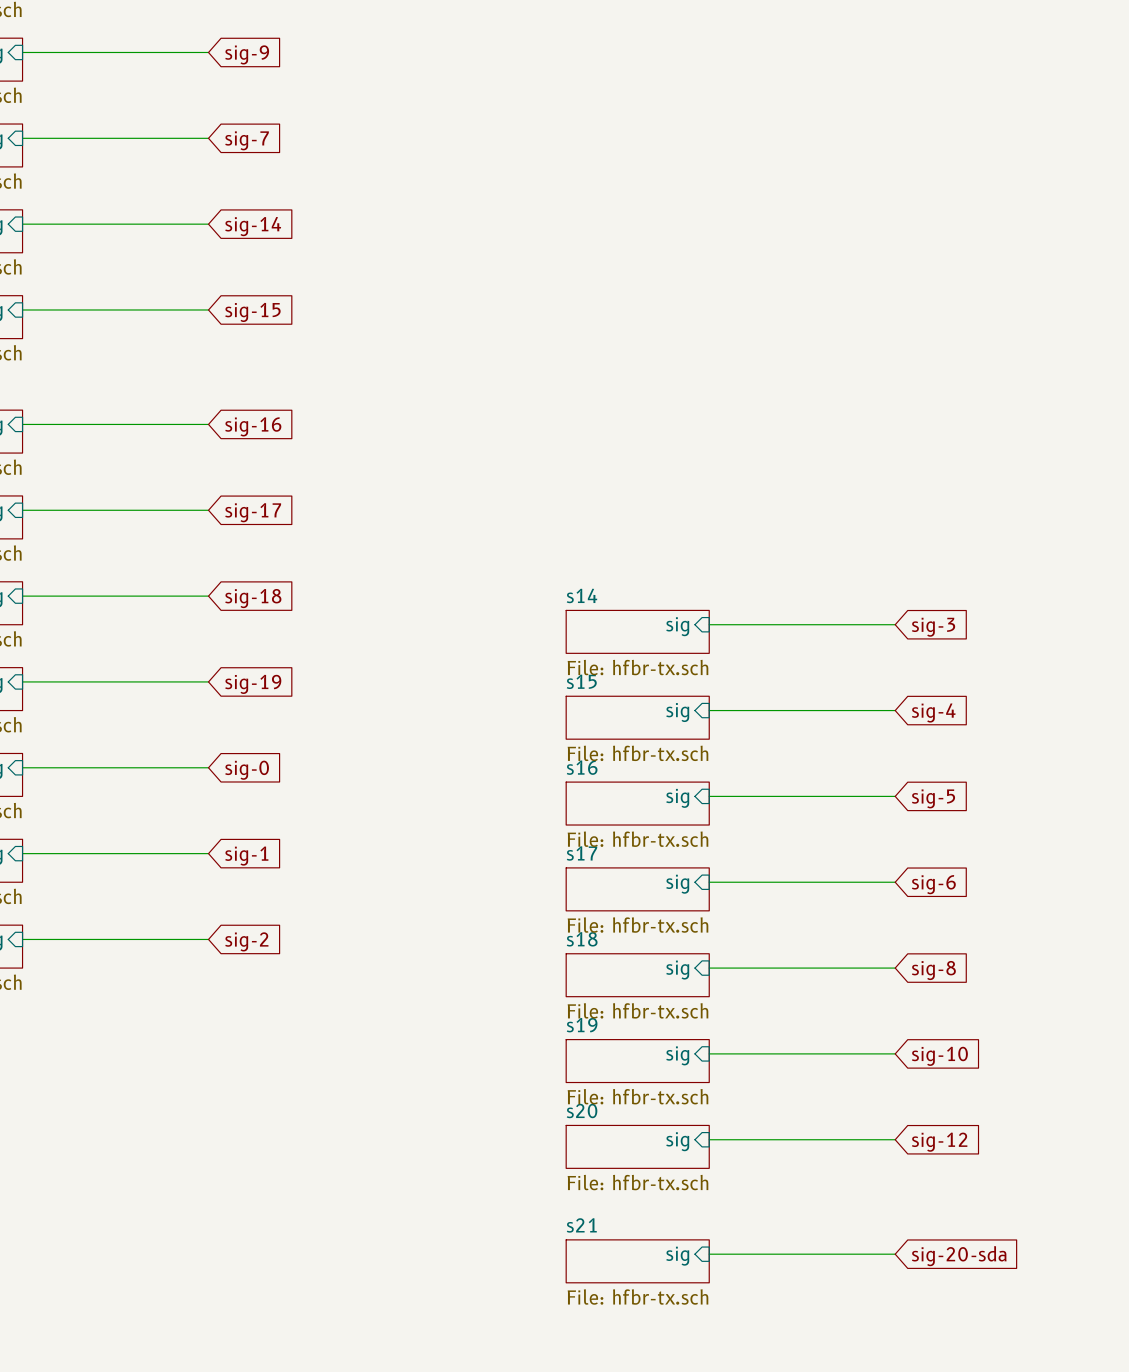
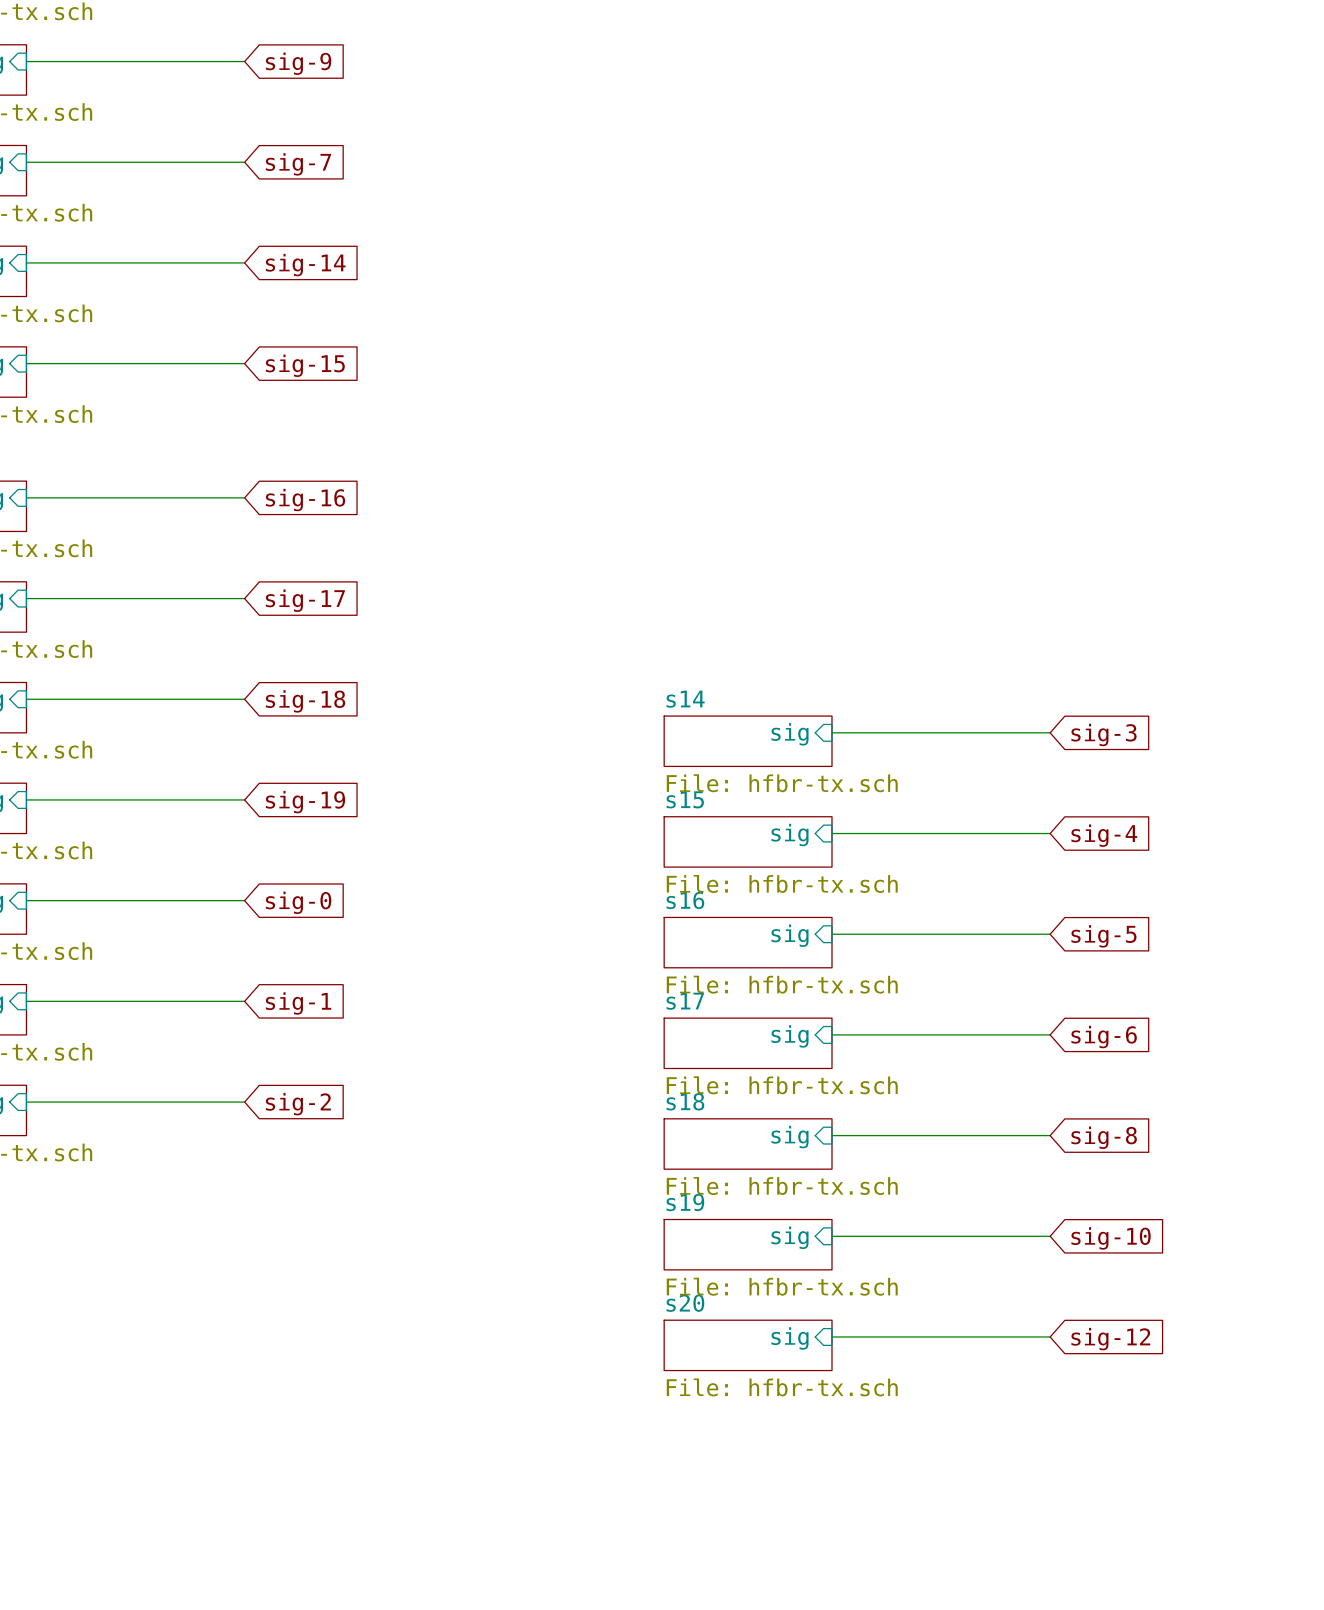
wire: (709, 1254) (895, 1254) -> none
sheet pin: sig (677, 1256) -> none
global label: sig-20-sda (959, 1256) -> none
sheet s21: File: hfbr-tx.sch (637, 1261) -> none

